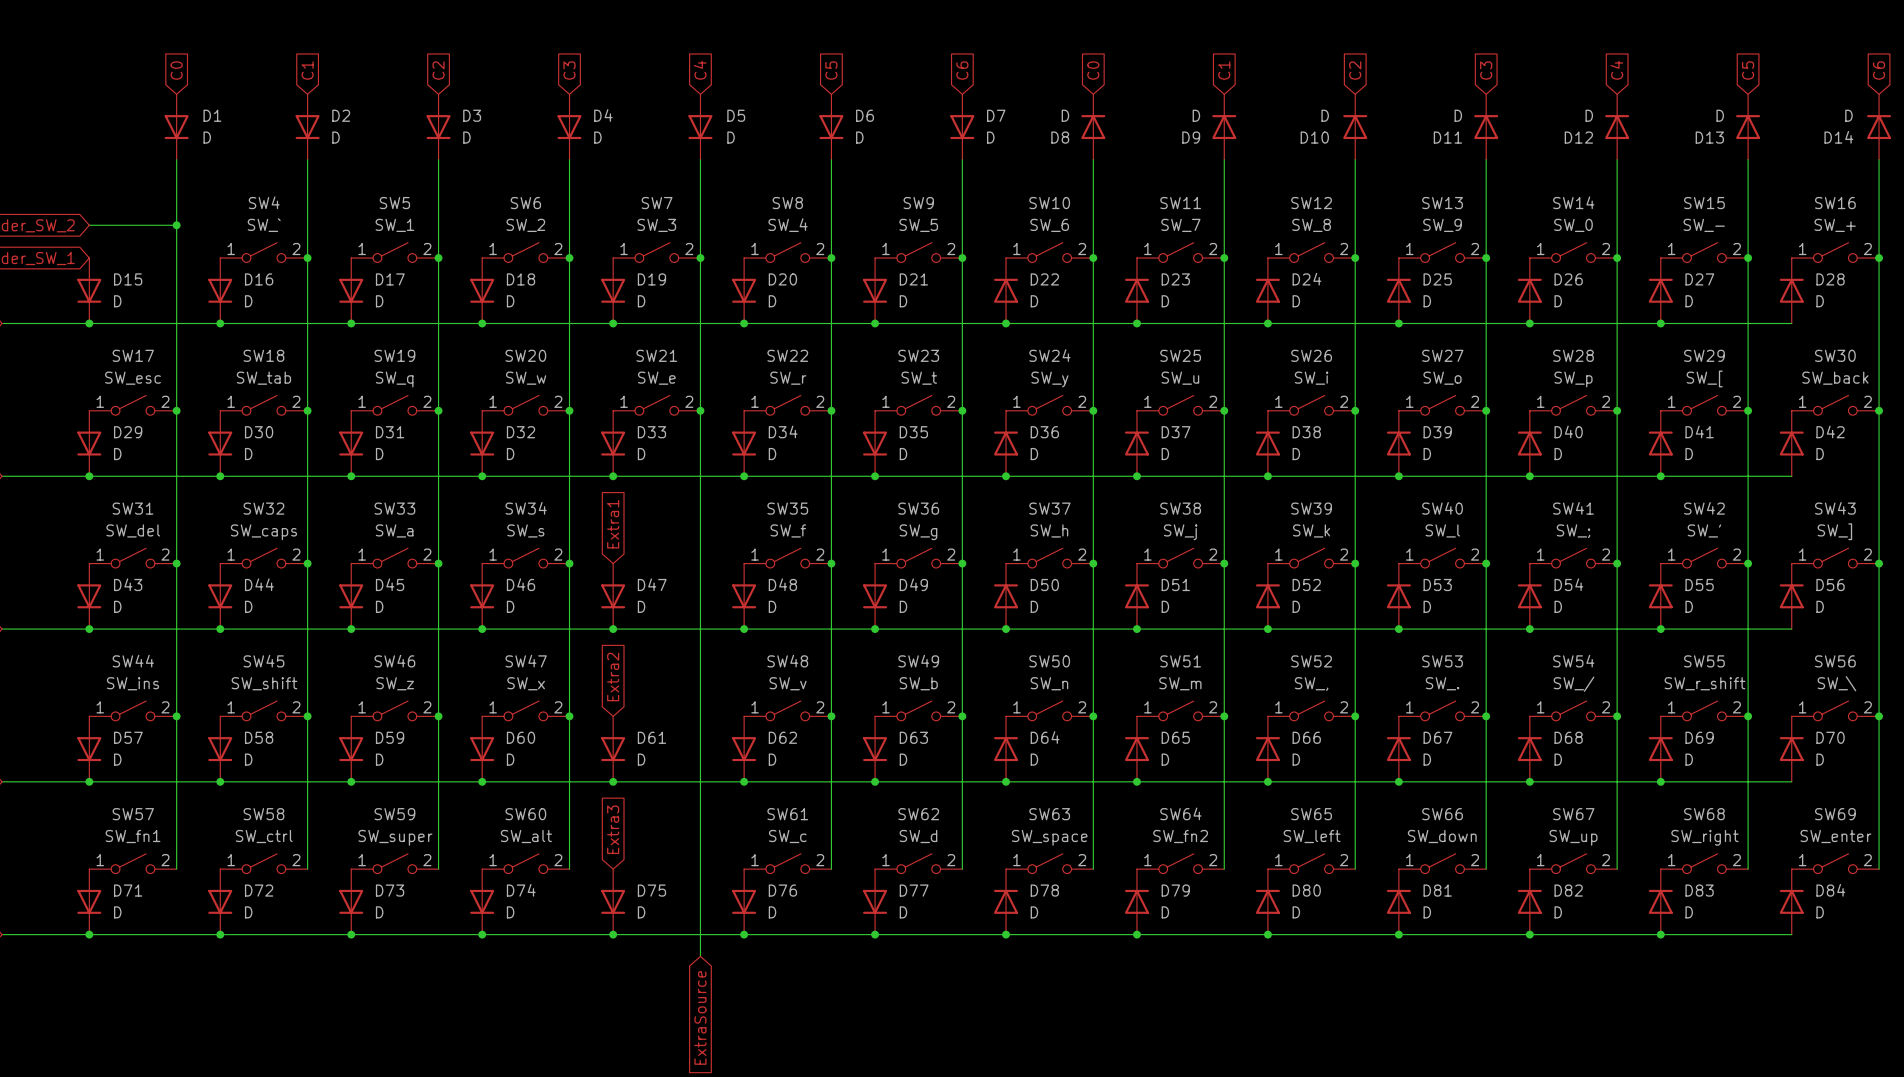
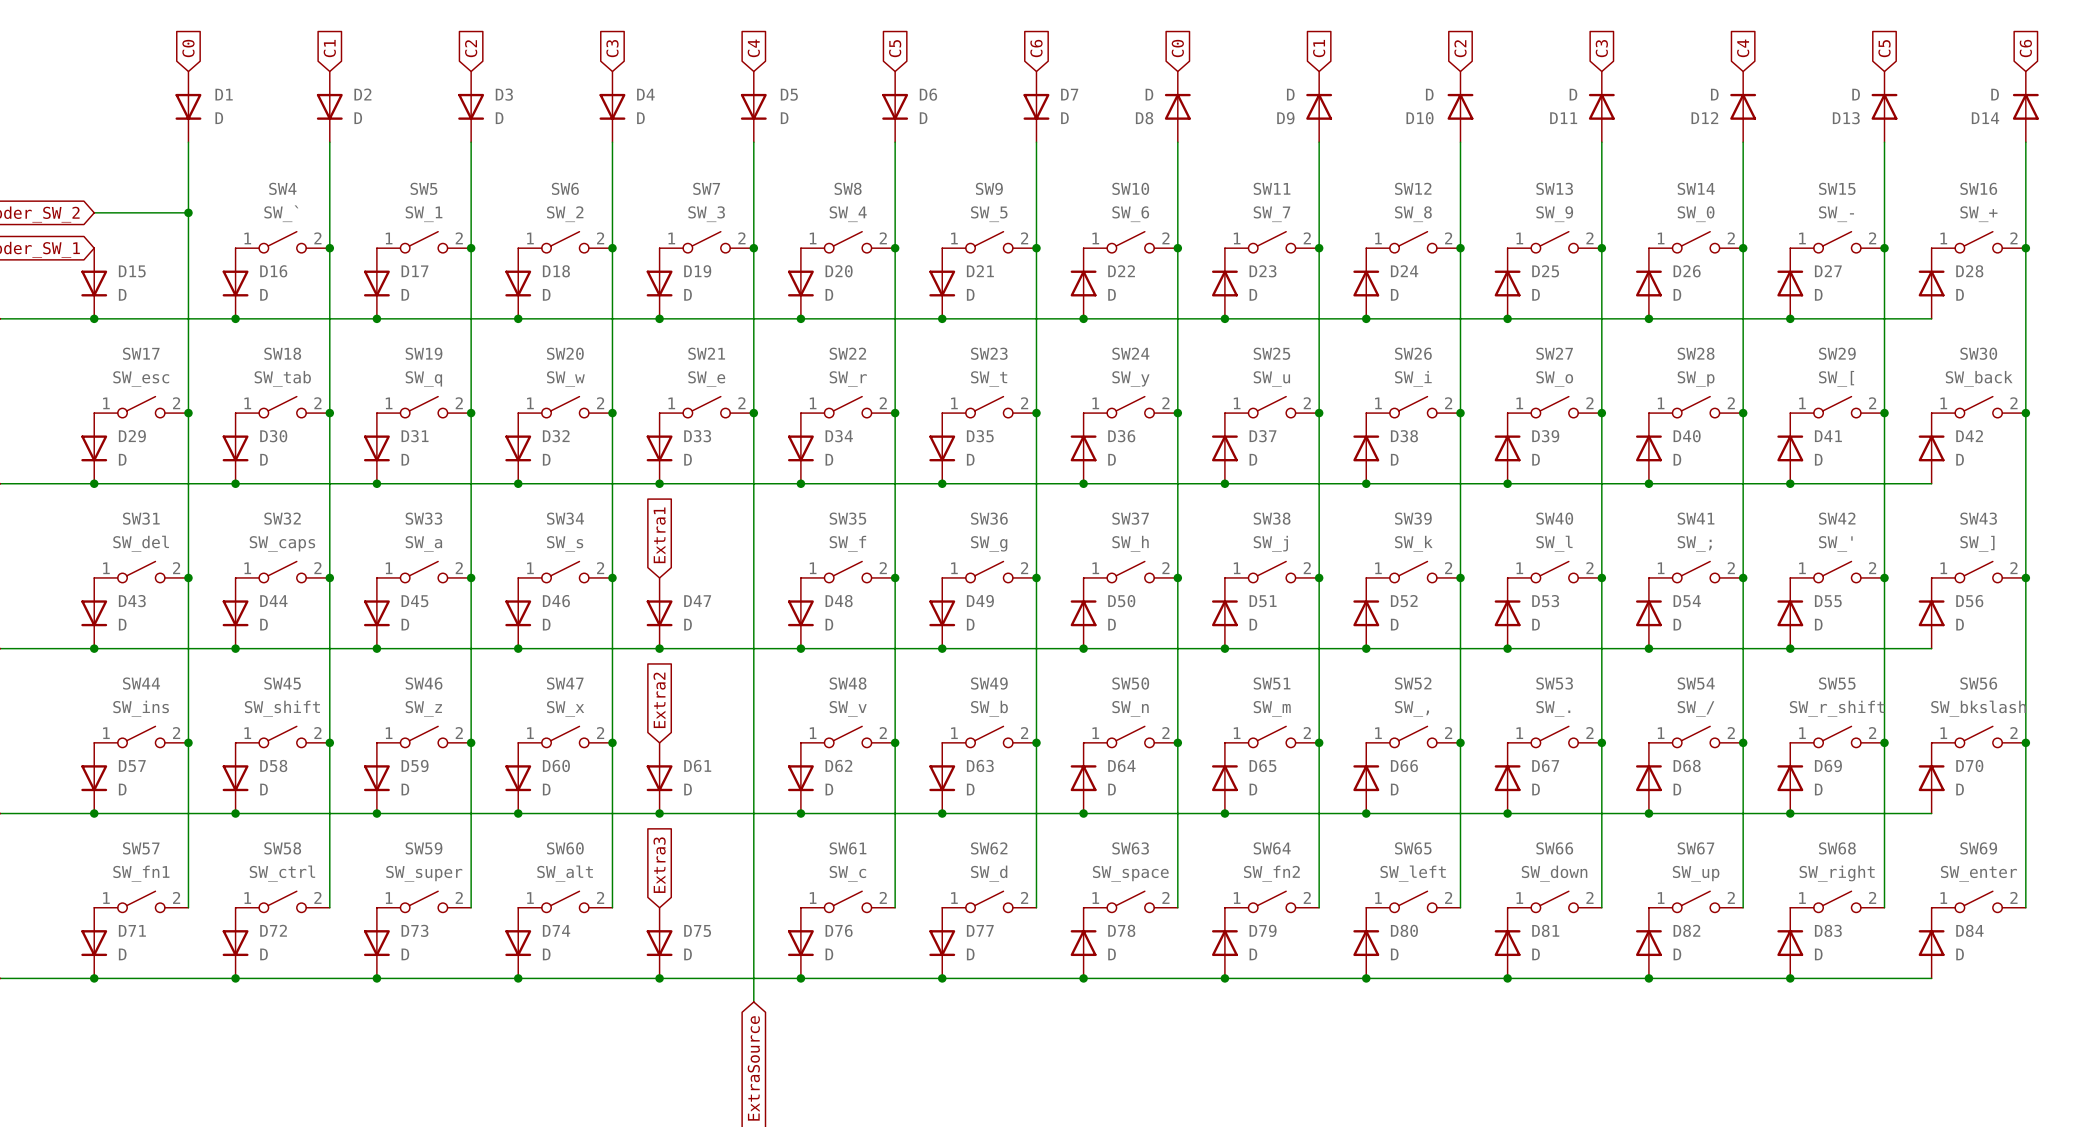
SW56 value: SW_\ (1836, 683) -> SW_bkslash (1978, 708)

